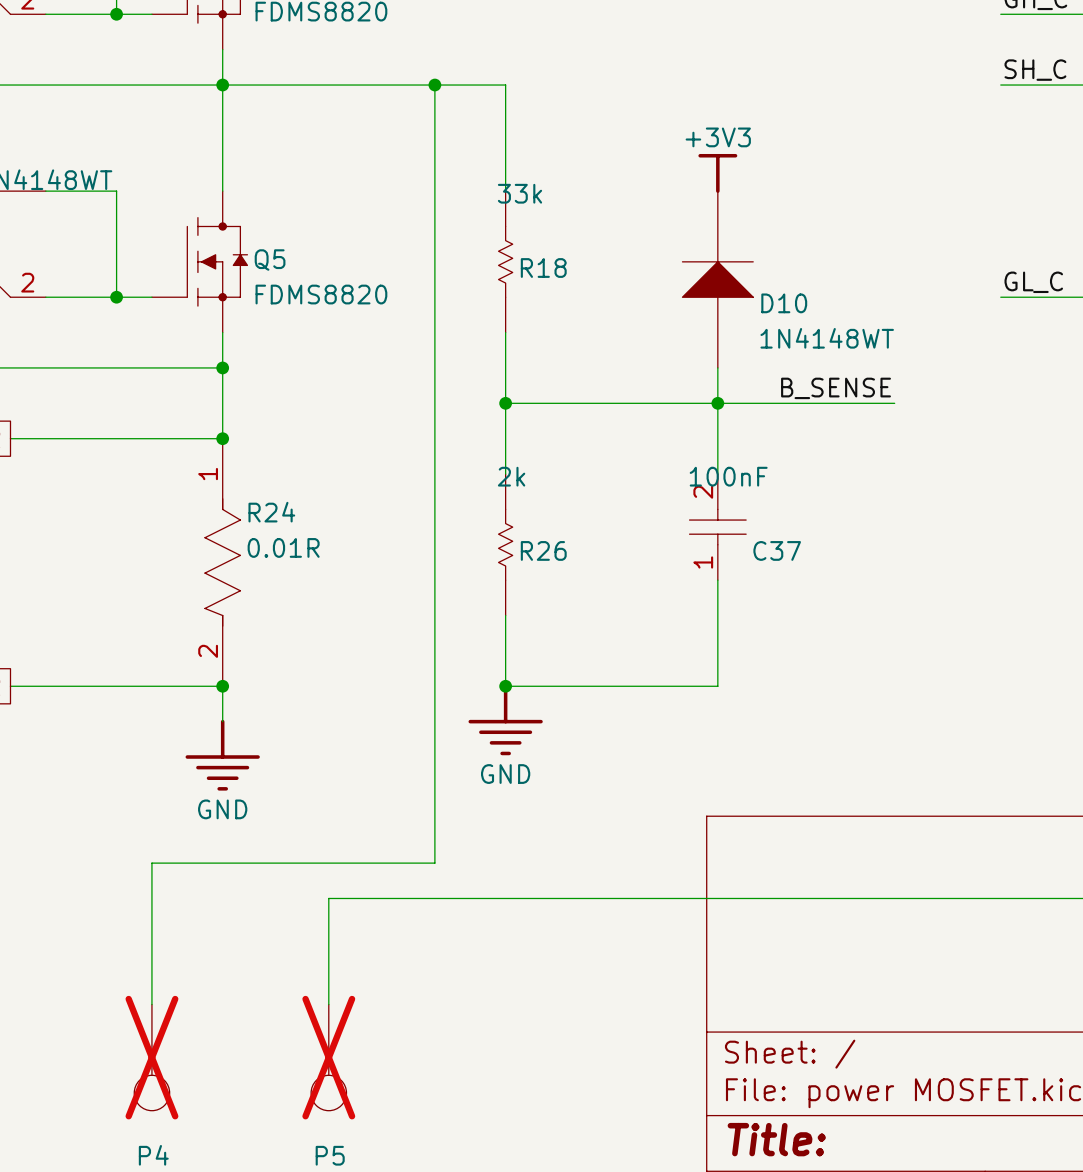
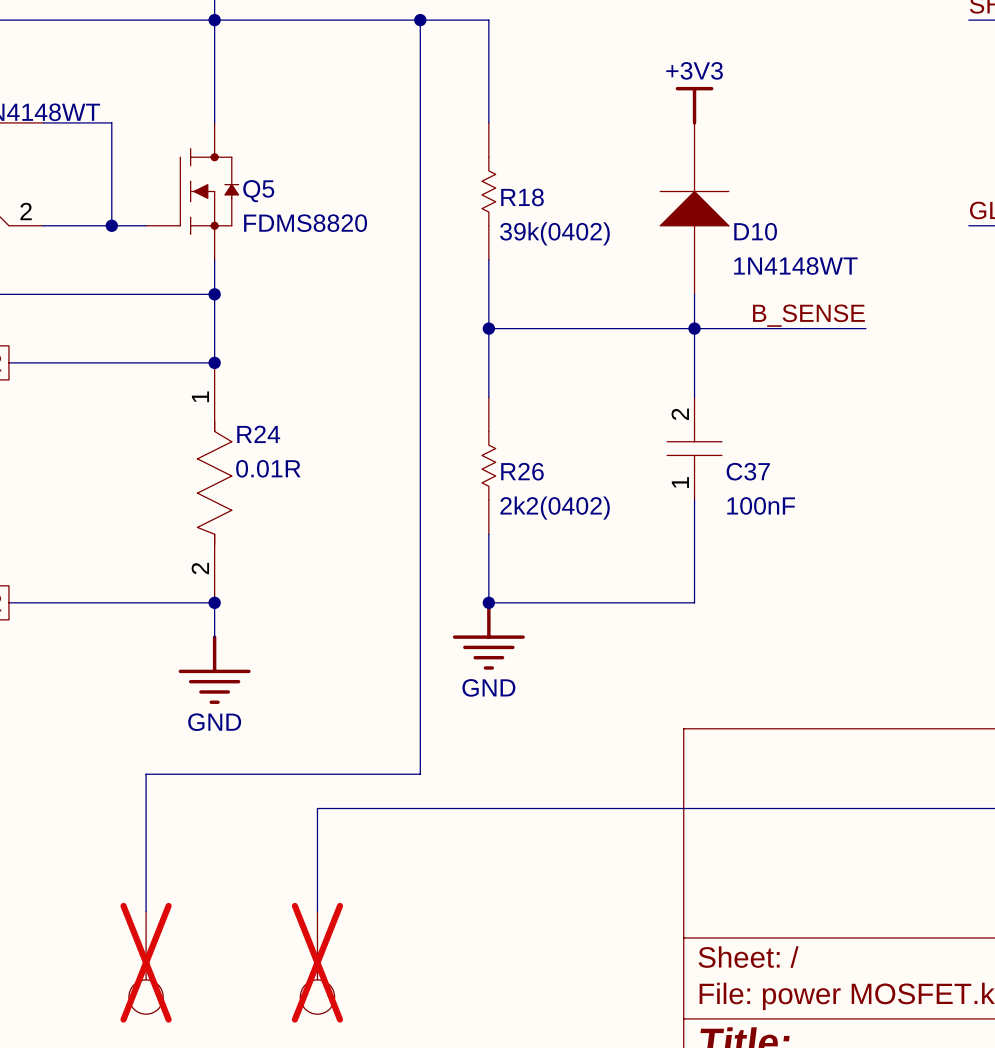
R18 value: 33k (520, 193) -> none
R18 text: none -> 39k(0402) (554, 233)
R26 value: 2k (511, 476) -> none
C37 value: 100nF (728, 476) -> none
C37 text: none -> 100nF (761, 505)
R26 text: none -> 2k2(0402) (555, 508)

